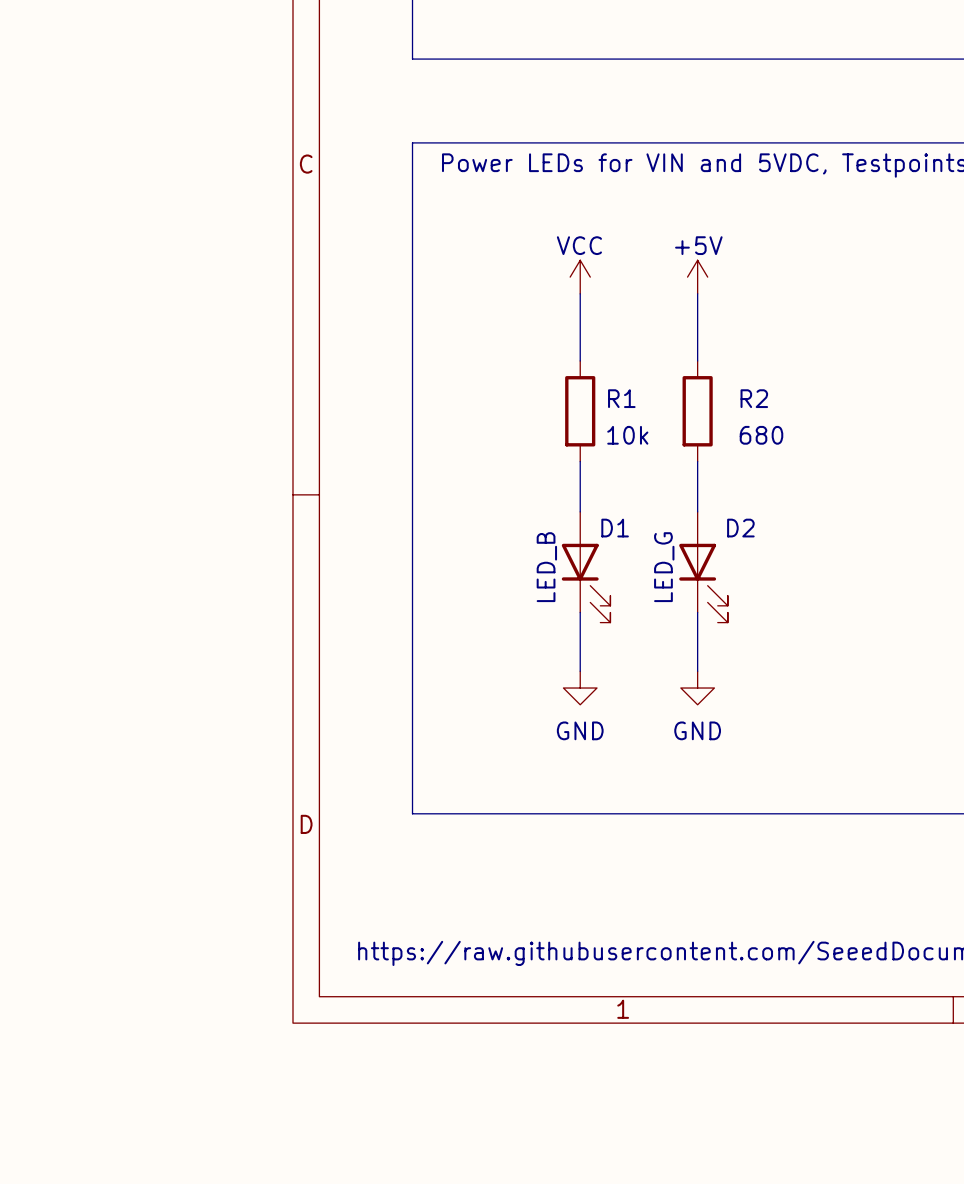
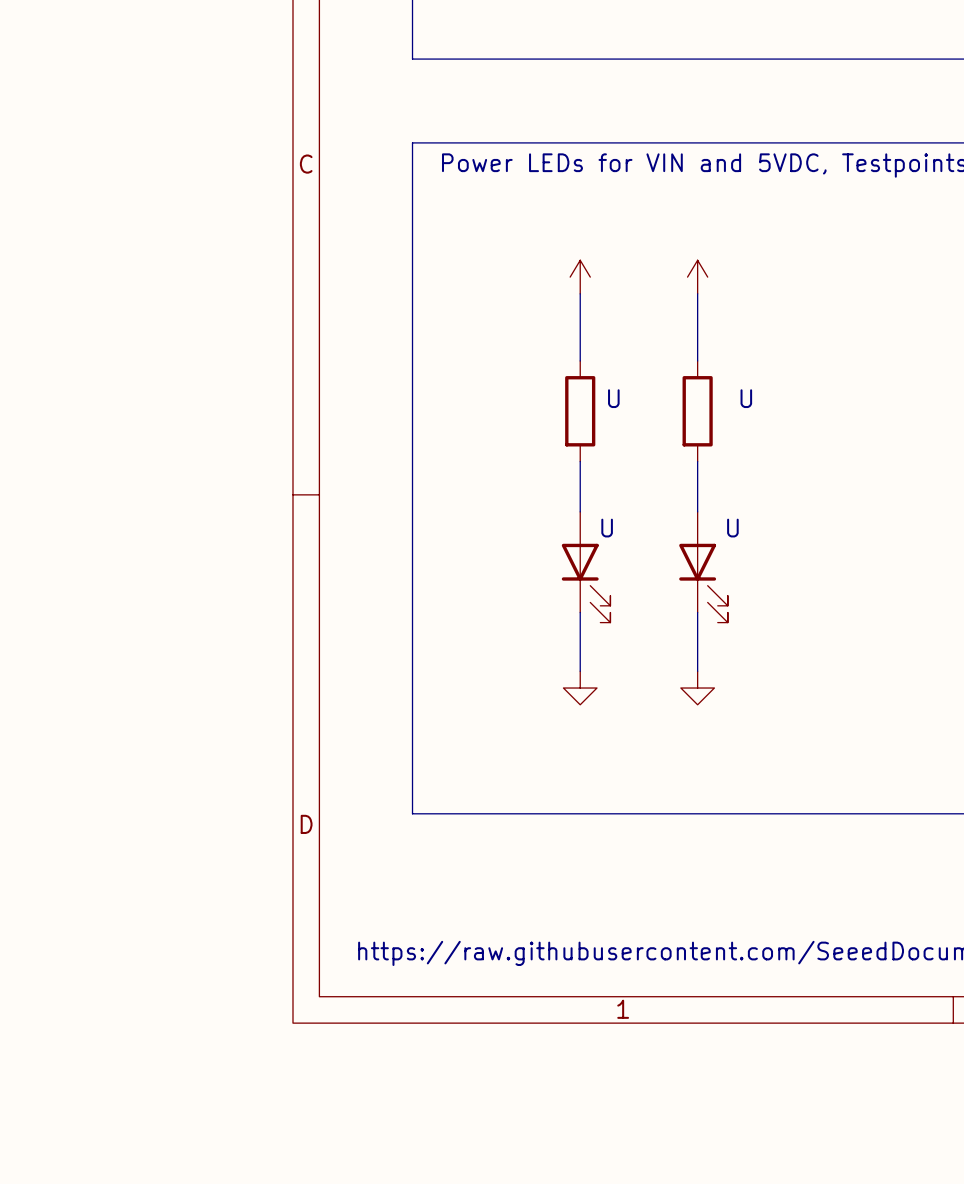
power symbol text: VCC (579, 245) -> none
power symbol text: +5V (698, 245) -> none
R1 name: R1 (621, 398) -> U (613, 398)
R2 name: R2 (754, 398) -> U (746, 398)
R1 value: 10k (627, 435) -> none
R2 value: 680 (761, 435) -> none
D1 name: D1 (615, 528) -> U (607, 528)
D2 name: D2 (740, 528) -> U (732, 528)
D1 value: LED_B (546, 567) -> none
D2 value: LED_G (664, 567) -> none
power symbol text: GND (580, 730) -> none
power symbol text: GND (697, 730) -> none

